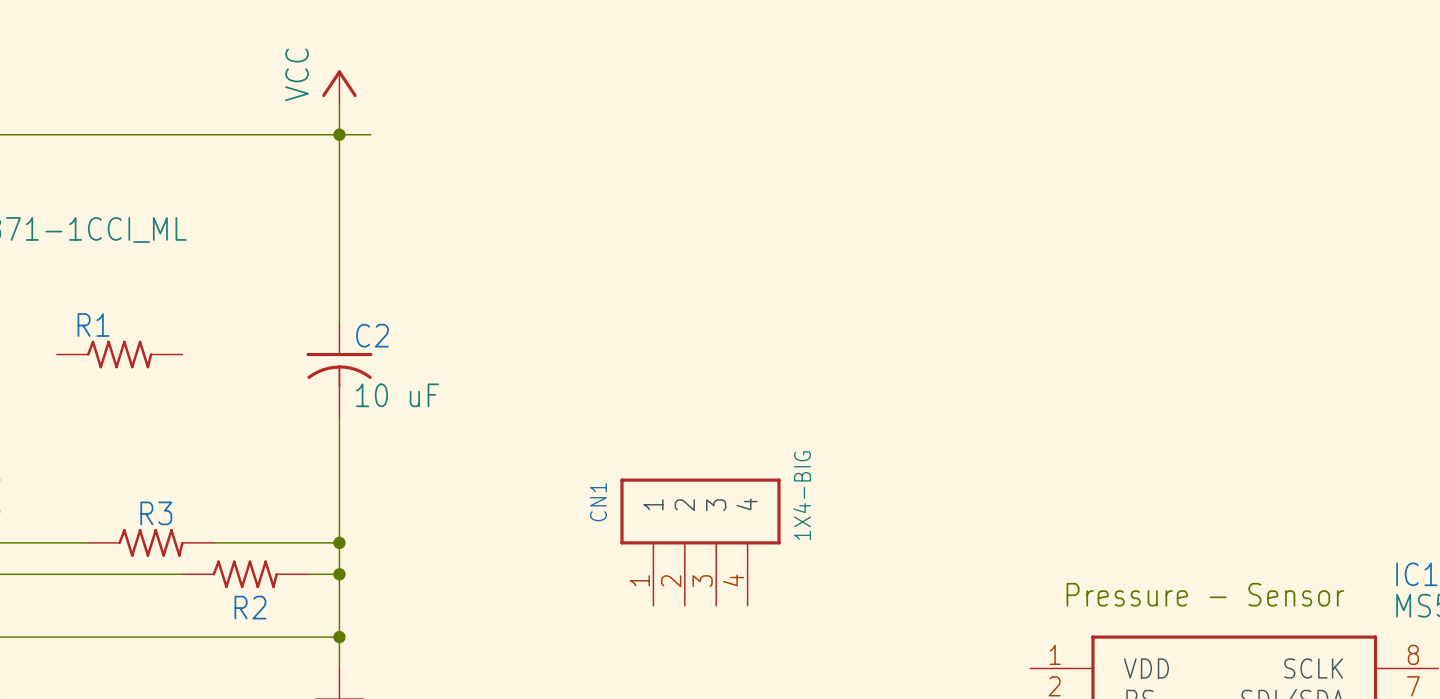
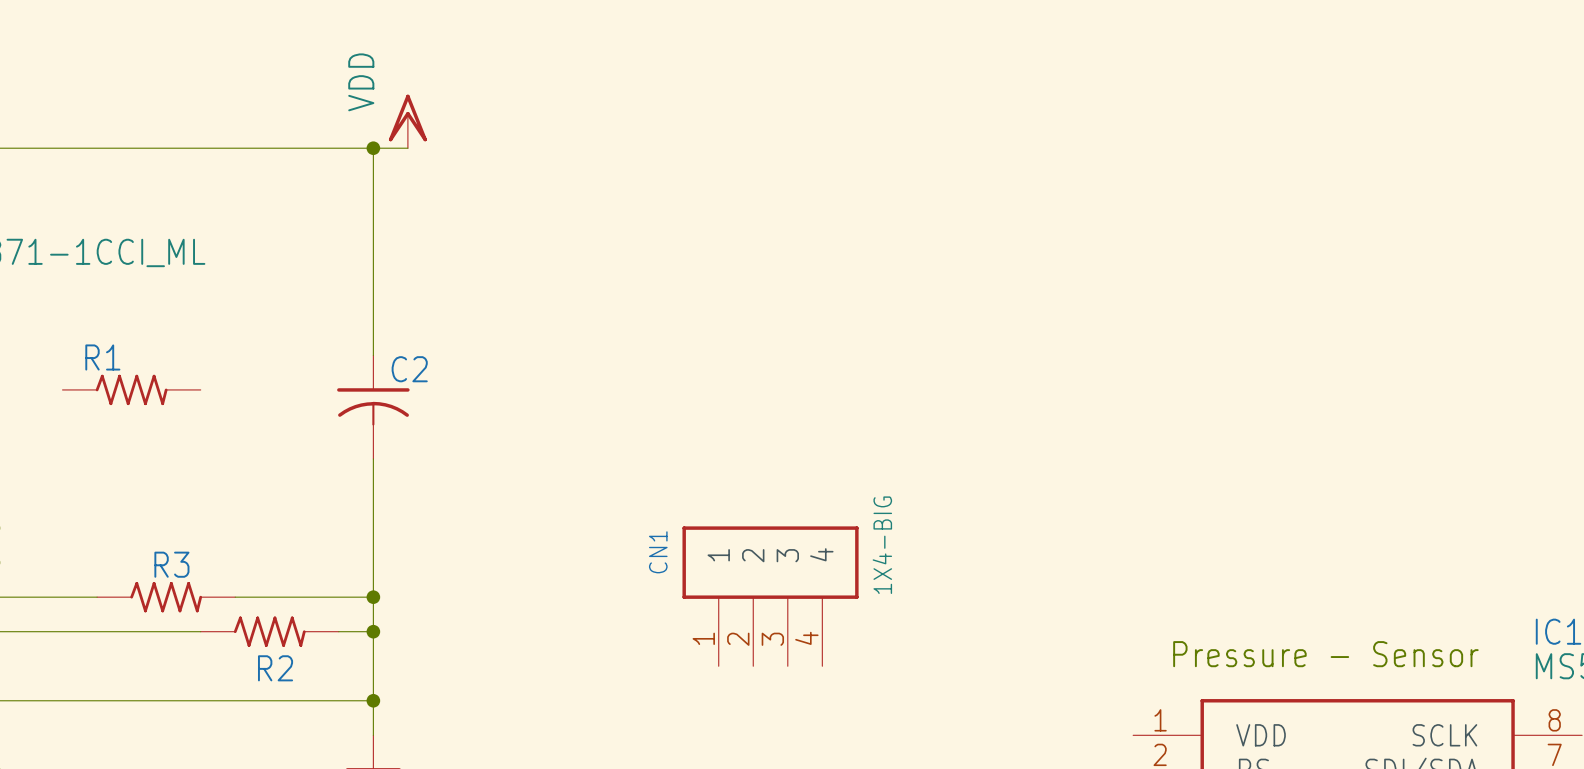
power symbol: VCC (339, 86) -> none
wire: (339, 103) (339, 134) -> none
power symbol: none -> VDD (407, 121)
C2 value: 10 uF (397, 395) -> none

